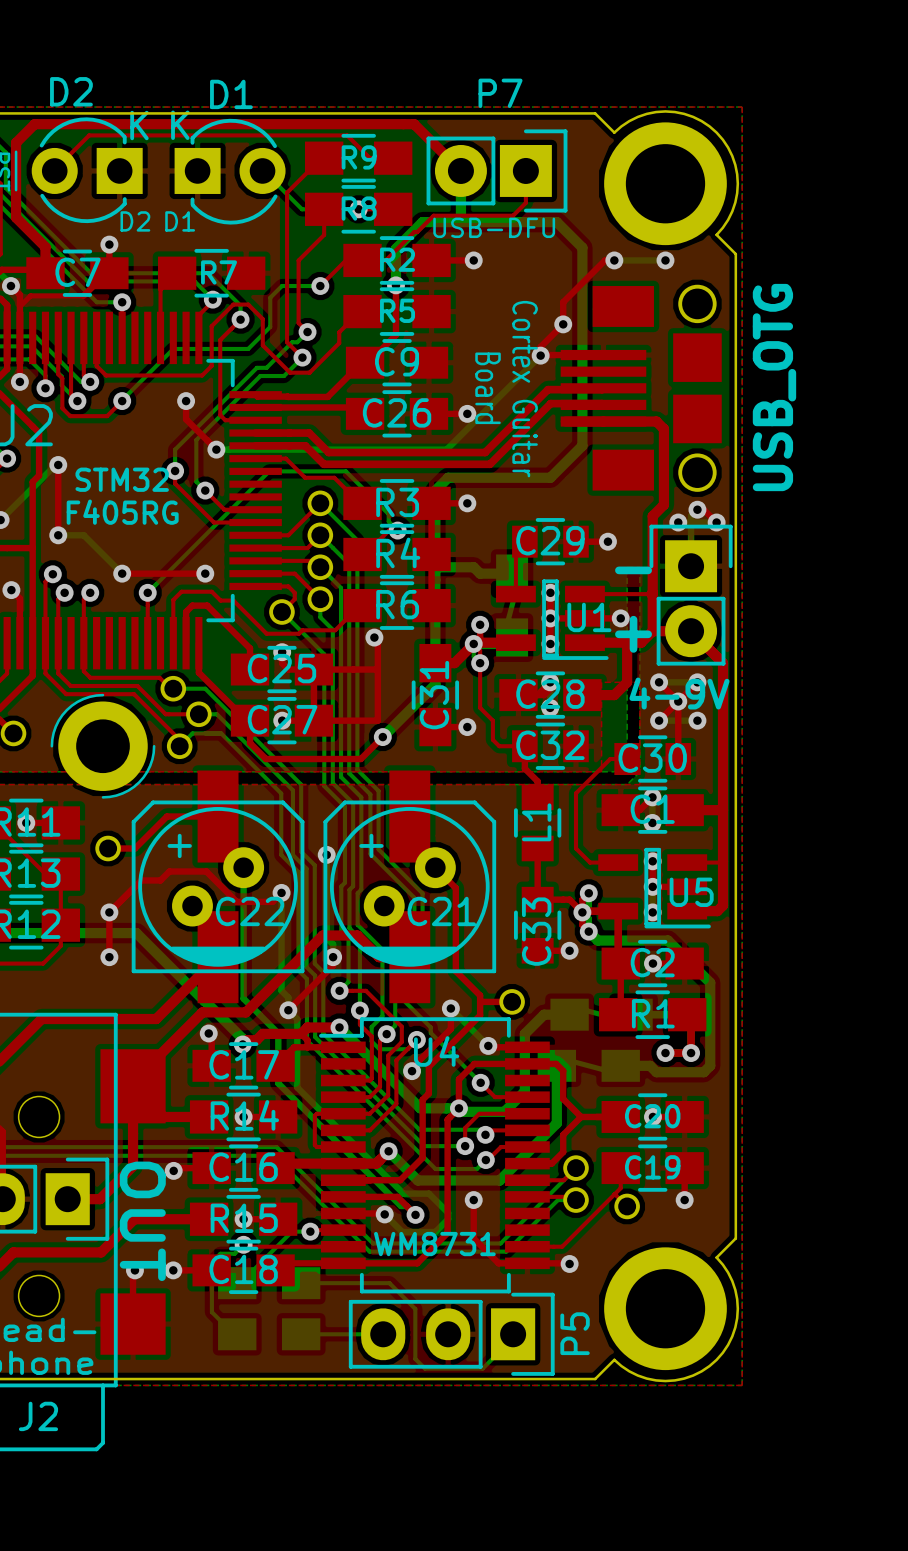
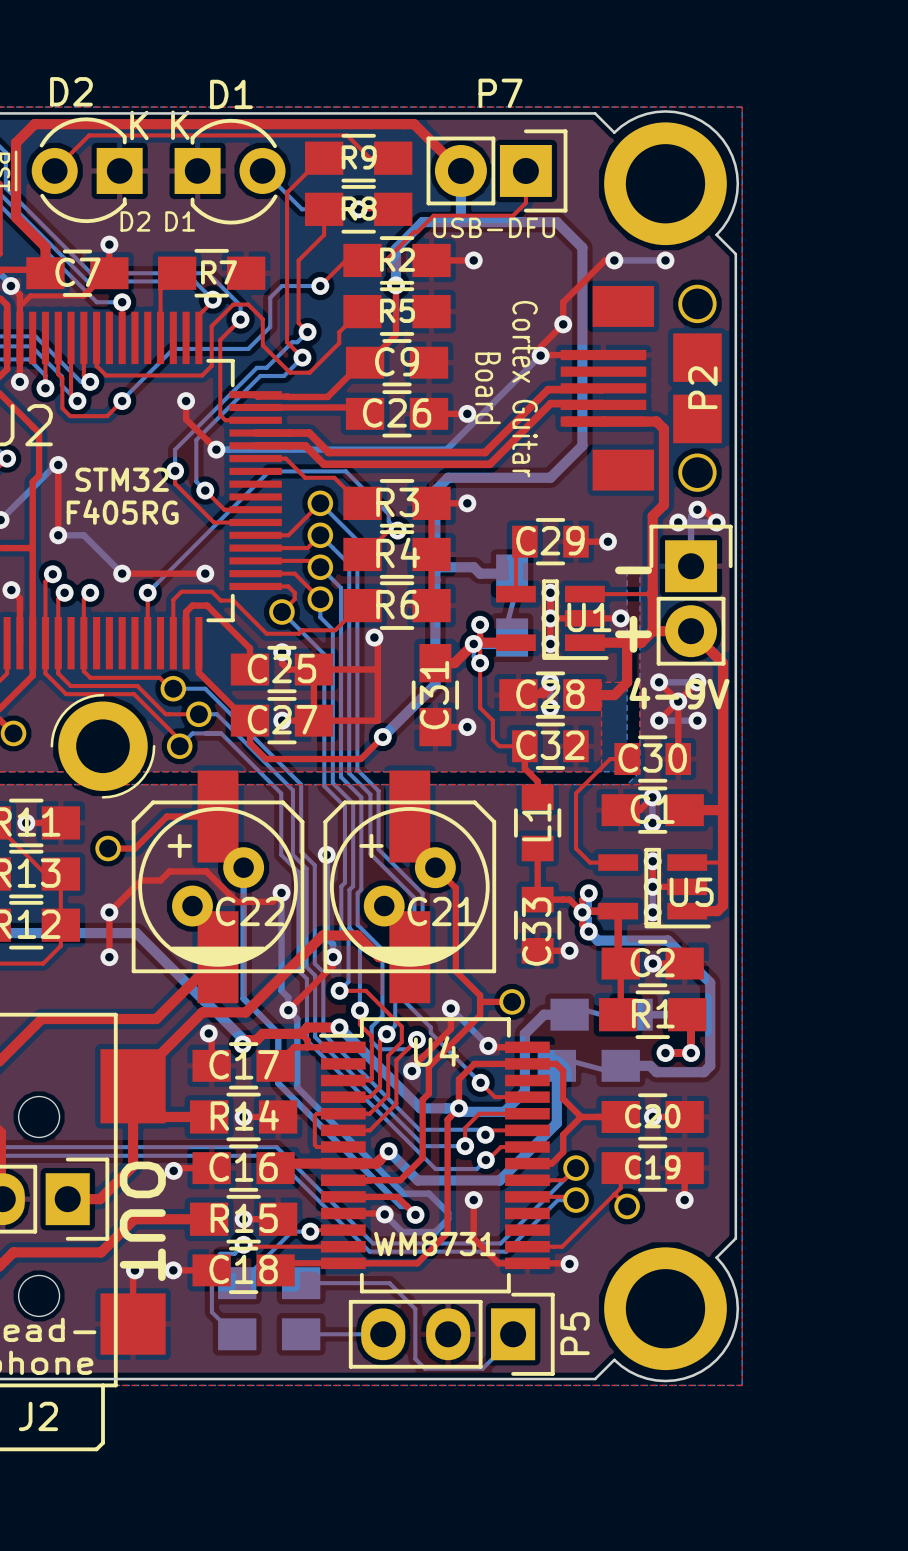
P2 name: none -> P2 (702, 387)
P2 value: USB_OTG (774, 387) -> none

